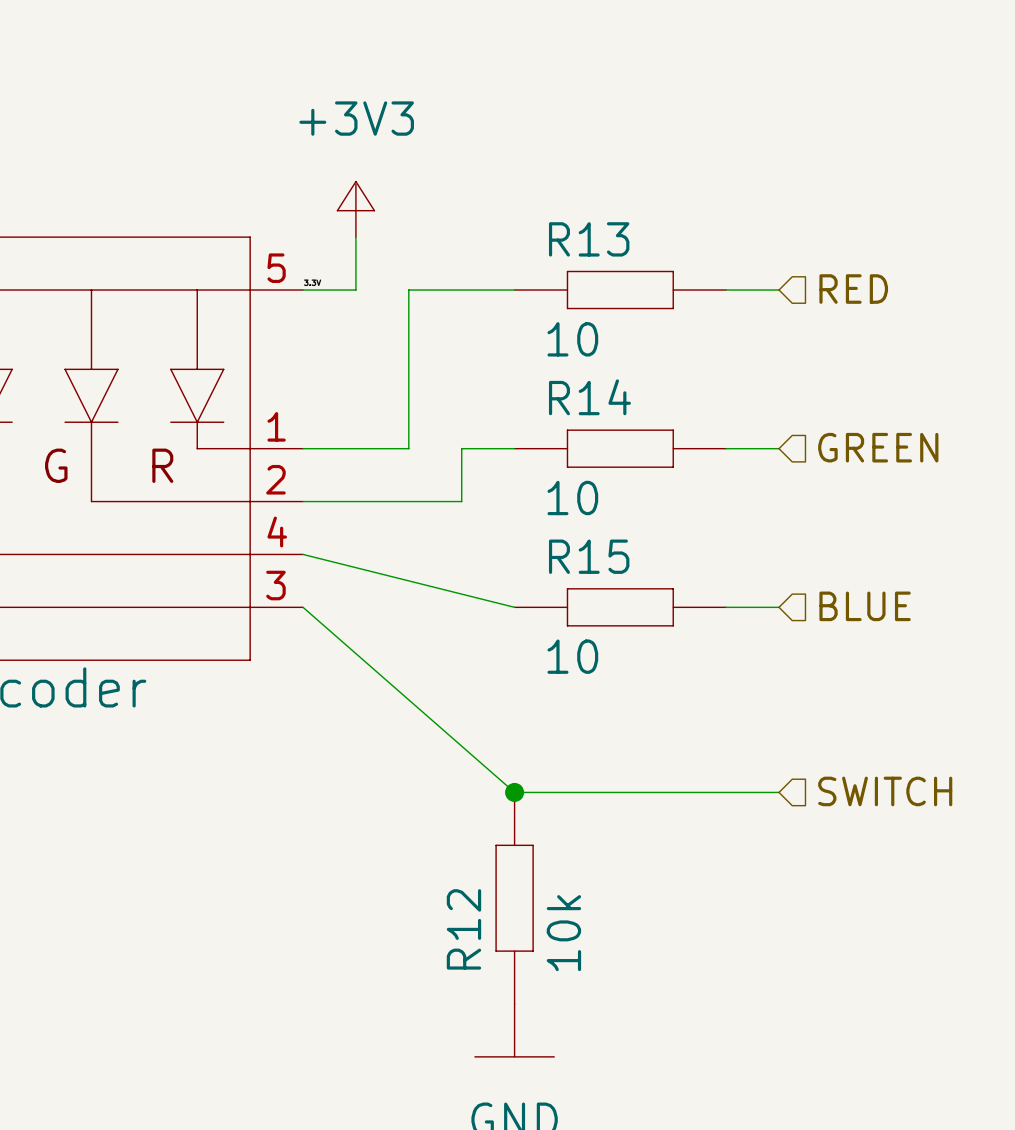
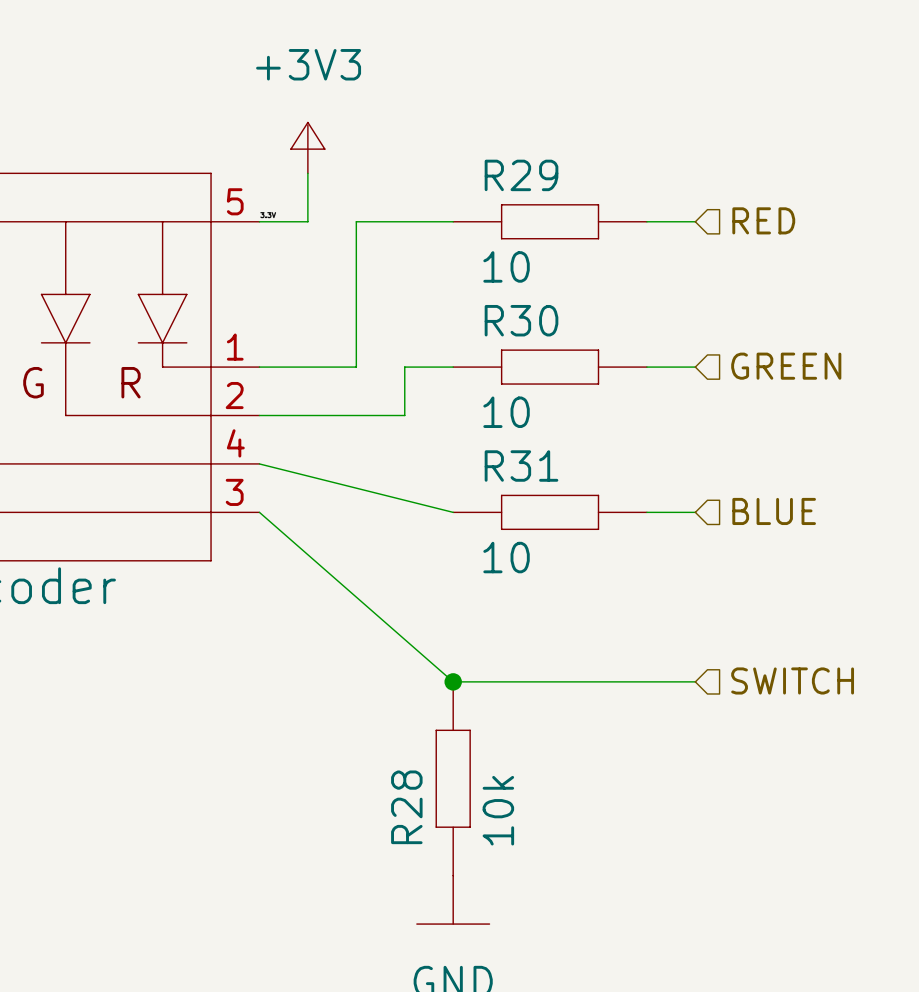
R13 name: R13 (589, 239) -> R29 (521, 175)
R14 name: R14 (589, 397) -> R30 (521, 320)
R15 name: R15 (589, 556) -> R31 (521, 466)
R12 name: R12 (463, 929) -> R28 (406, 807)

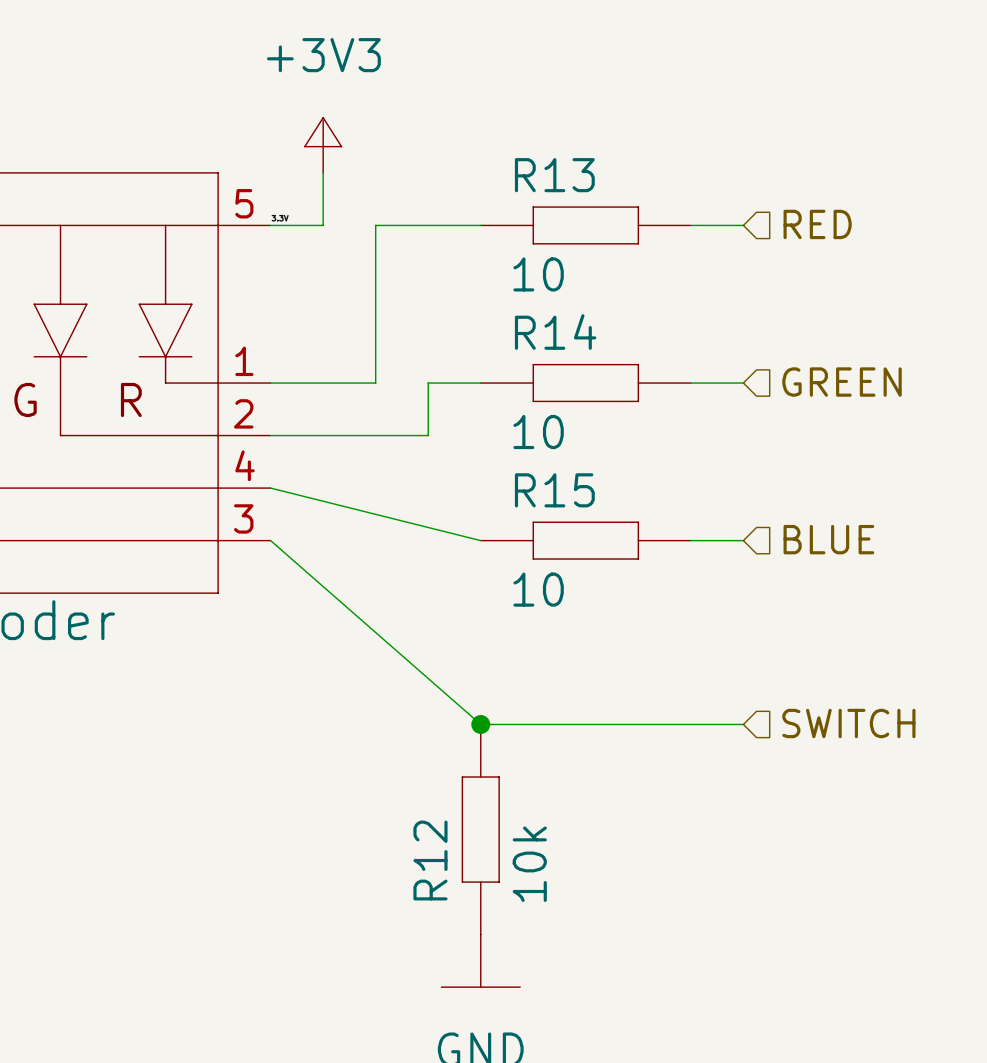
R29 name: R29 (521, 175) -> R13 (554, 175)
R30 name: R30 (521, 320) -> R14 (555, 332)
R31 name: R31 (521, 466) -> R15 (554, 490)
R28 name: R28 (406, 807) -> R12 (430, 860)

